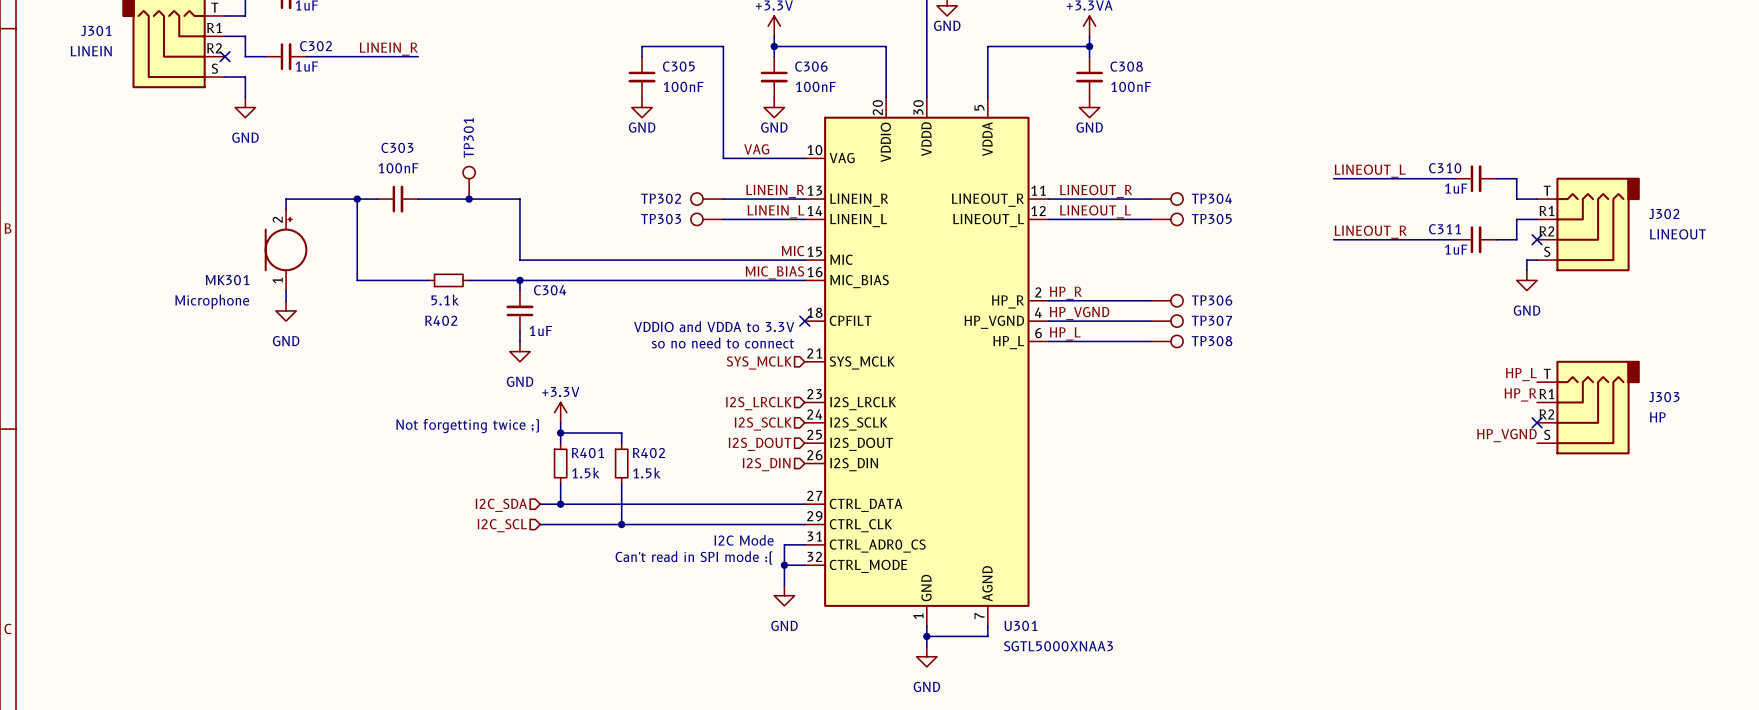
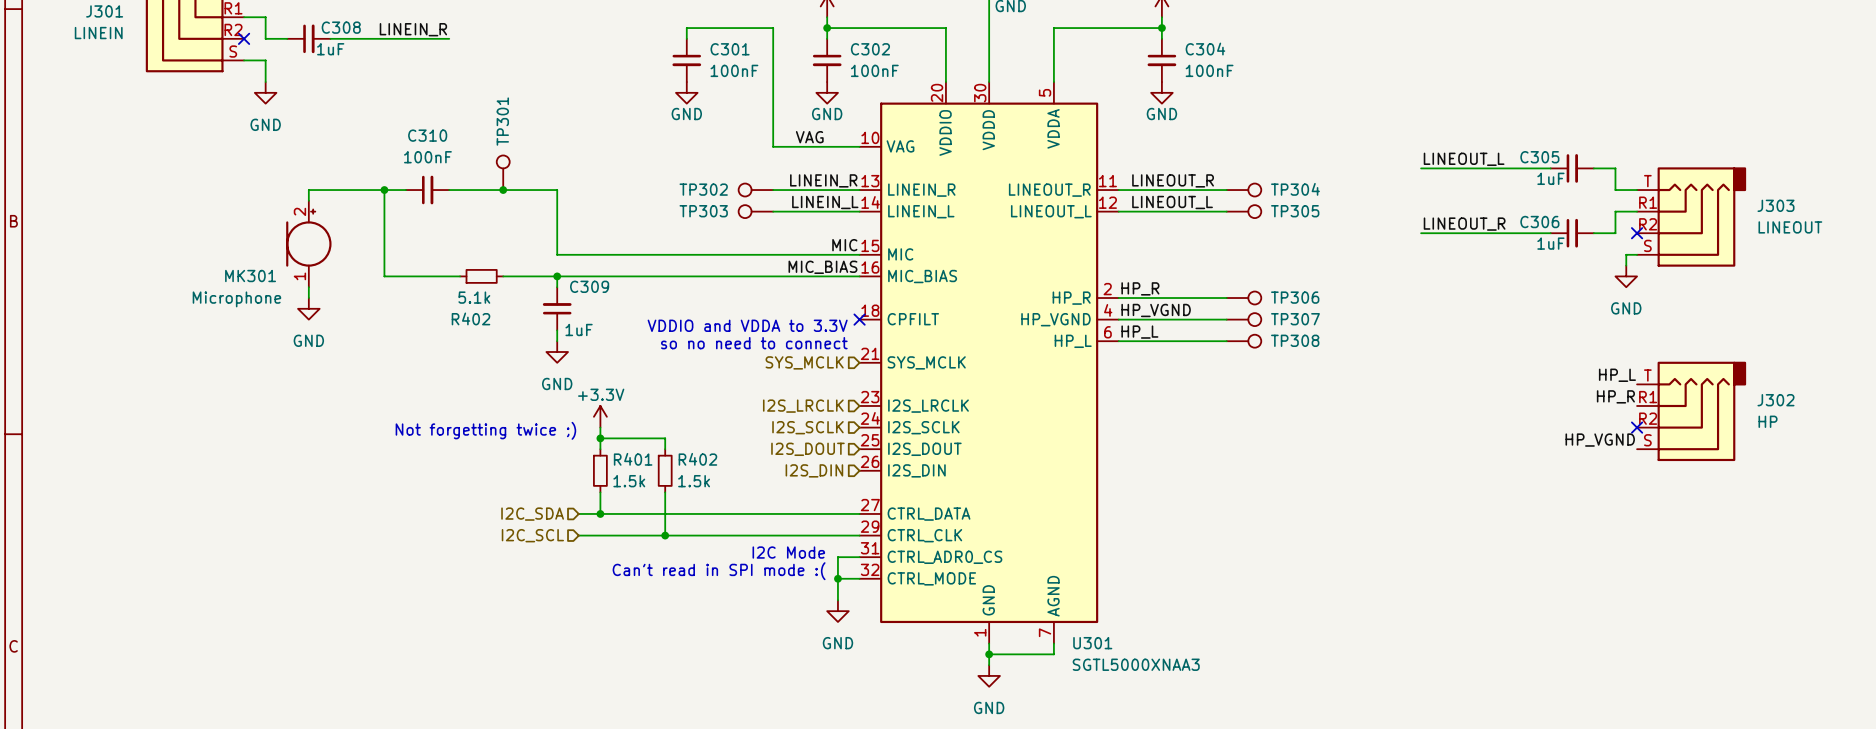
C302 name: C302 (316, 46) -> C308 (341, 27)
C305 name: C305 (678, 66) -> C301 (730, 49)
C306 name: C306 (811, 66) -> C302 (870, 49)
C308 name: C308 (1126, 66) -> C304 (1205, 49)
C303 name: C303 (397, 147) -> C310 (427, 135)
C310 name: C310 (1445, 168) -> C305 (1539, 157)
J302 name: J302 (1664, 214) -> J303 (1775, 205)
C311 name: C311 (1444, 229) -> C306 (1539, 222)
C304 name: C304 (550, 290) -> C309 (589, 286)
J303 name: J303 (1664, 397) -> J302 (1775, 400)

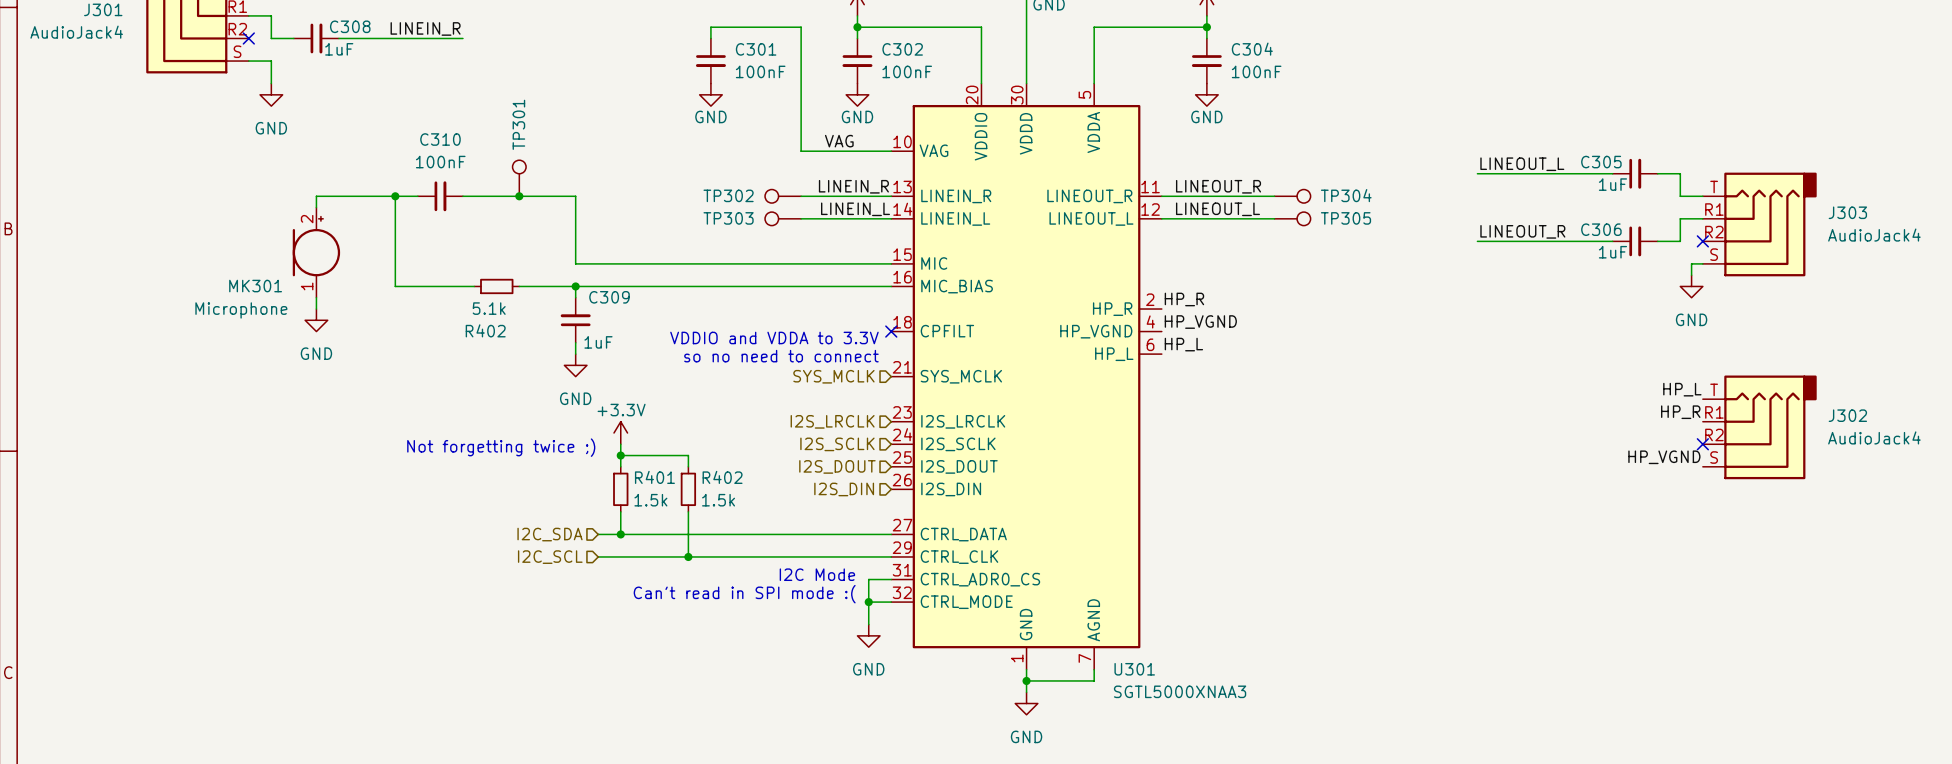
J301 value: LINEIN (98, 33) -> AudioJack4 (76, 32)
J303 value: LINEOUT (1790, 227) -> AudioJack4 (1874, 235)
label: MIC (844, 245) -> none
label: MIC_BIAS (822, 267) -> none
wire: (1118, 298) (1226, 298) -> none
TP306: (1244, 298) -> none
wire: (1118, 319) (1226, 319) -> none
TP307: (1244, 319) -> none
wire: (1118, 341) (1226, 341) -> none
TP308: (1244, 341) -> none
J302 value: HP (1768, 421) -> AudioJack4 (1874, 437)

